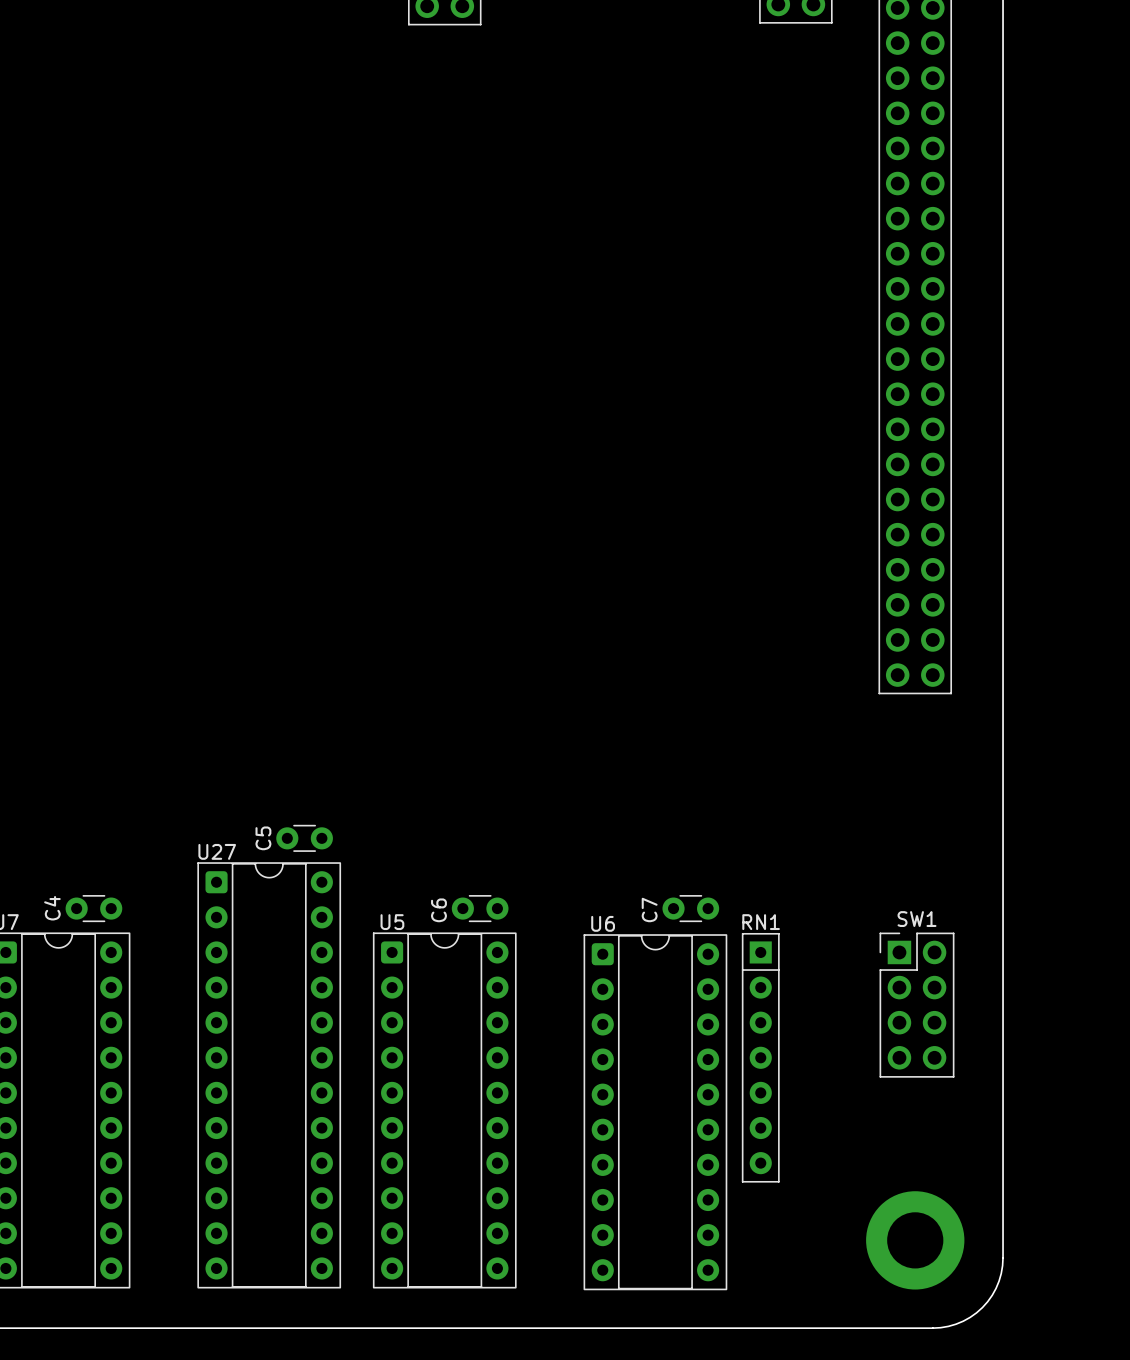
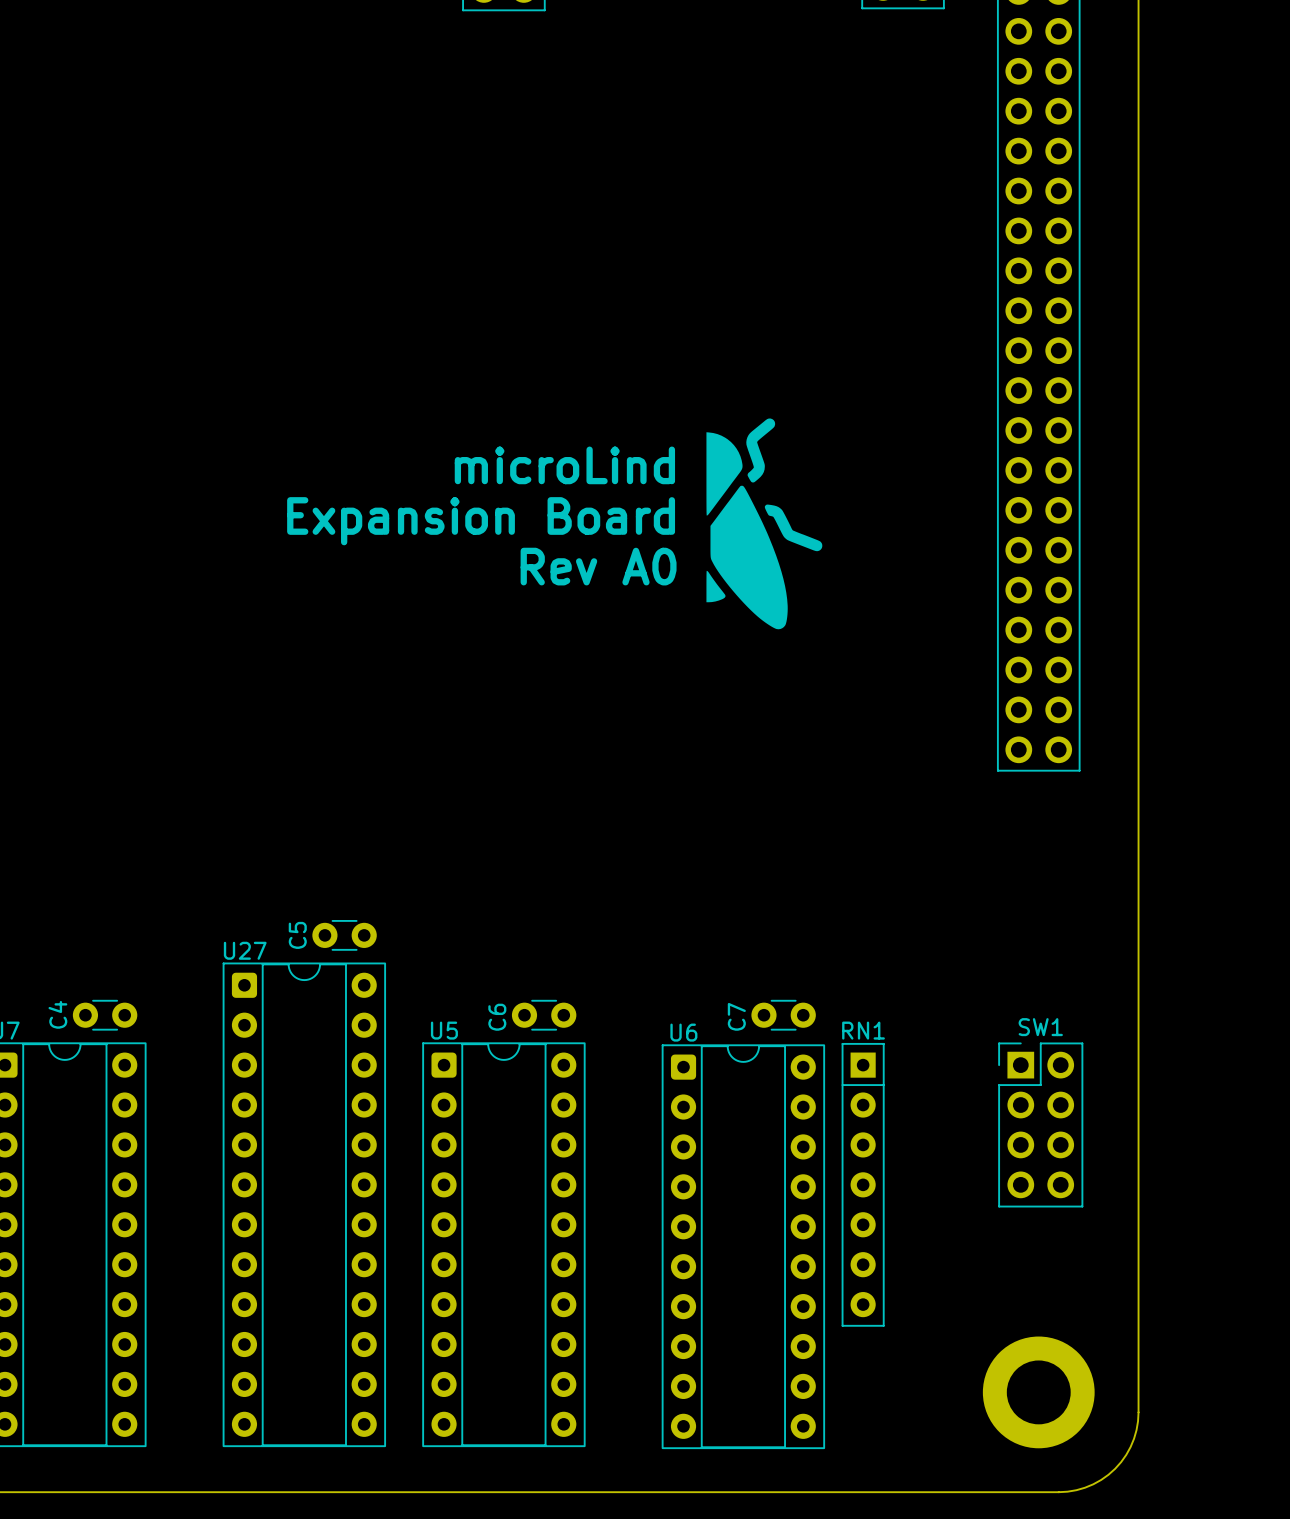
drawing: none -> [706, 418, 823, 630]
text: none -> microLind (564, 465)
text: none -> Expansion Board (481, 521)
text: none -> Rev A0 (598, 566)

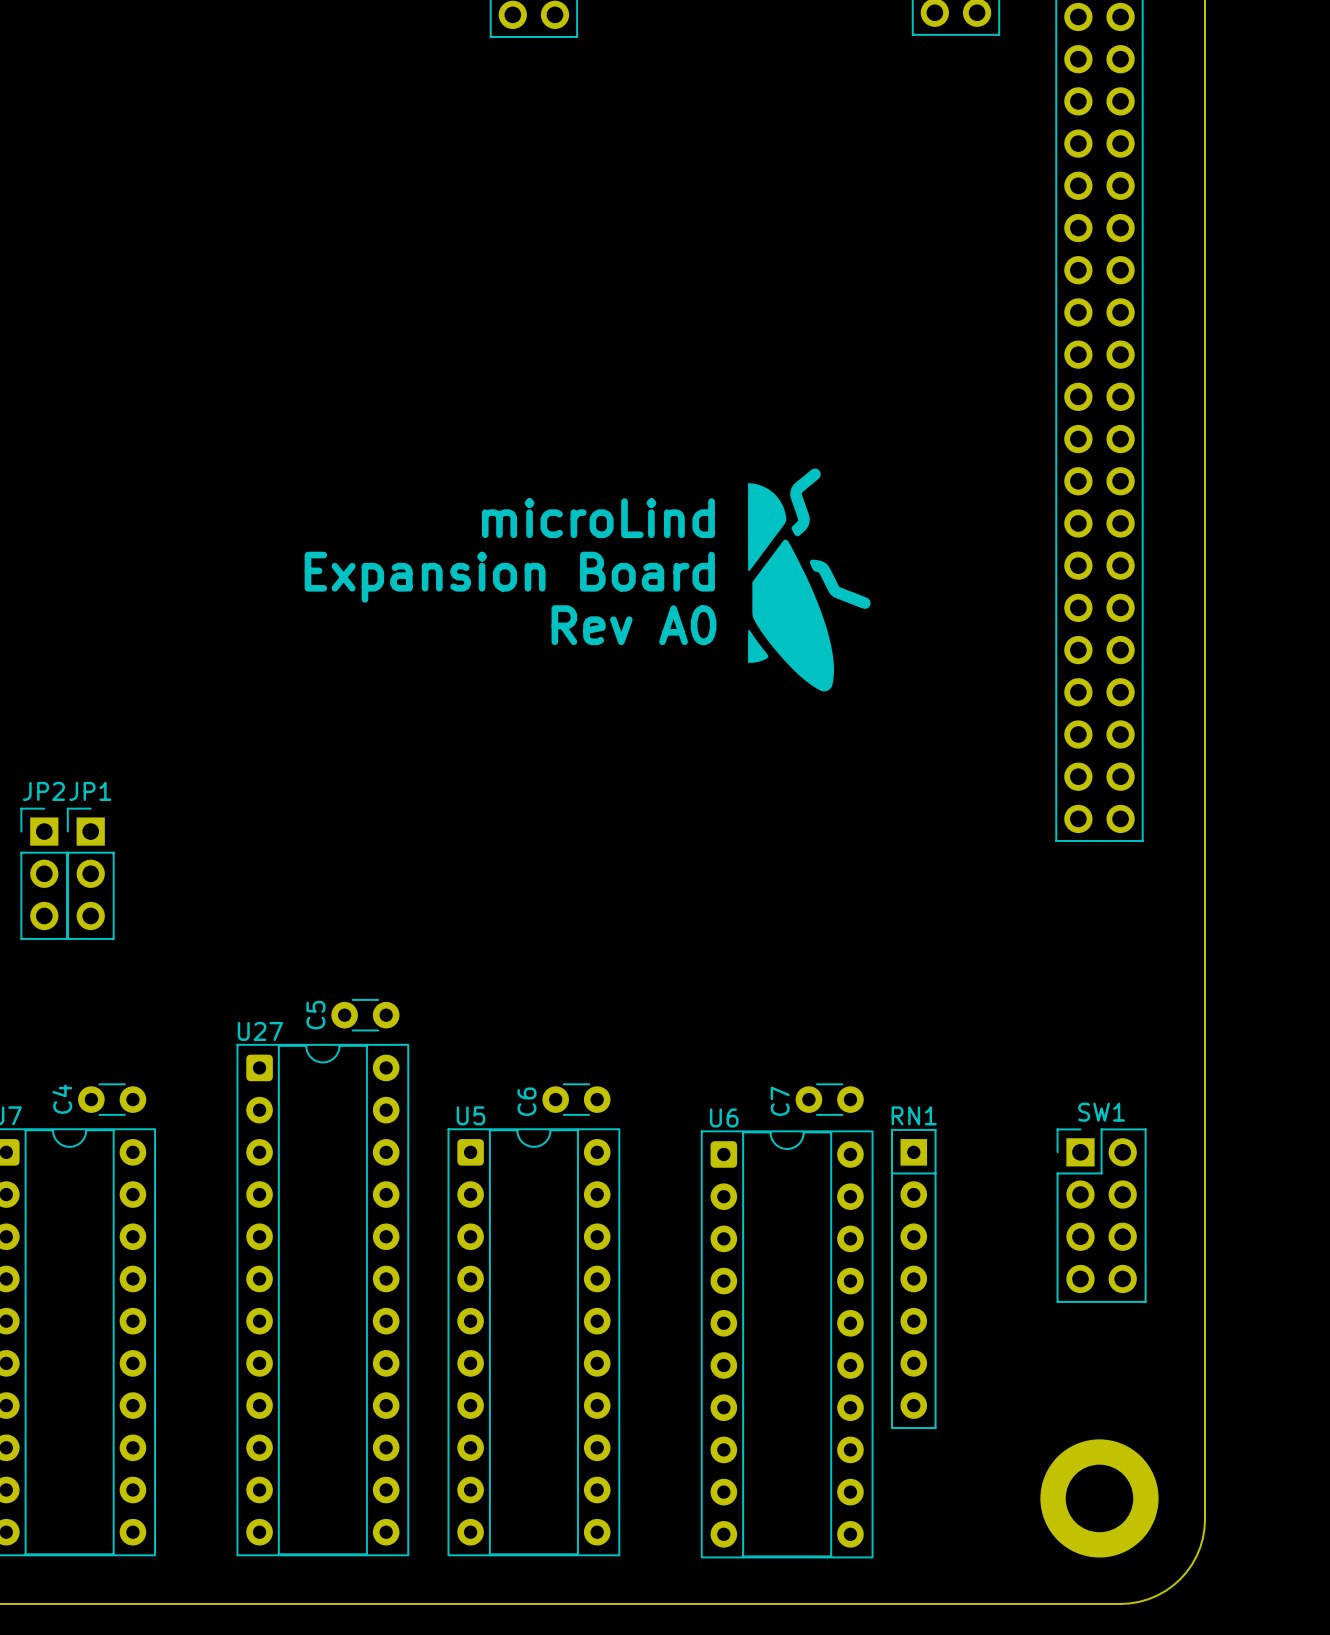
JP2: none -> (44, 873)
JP1: none -> (90, 873)

